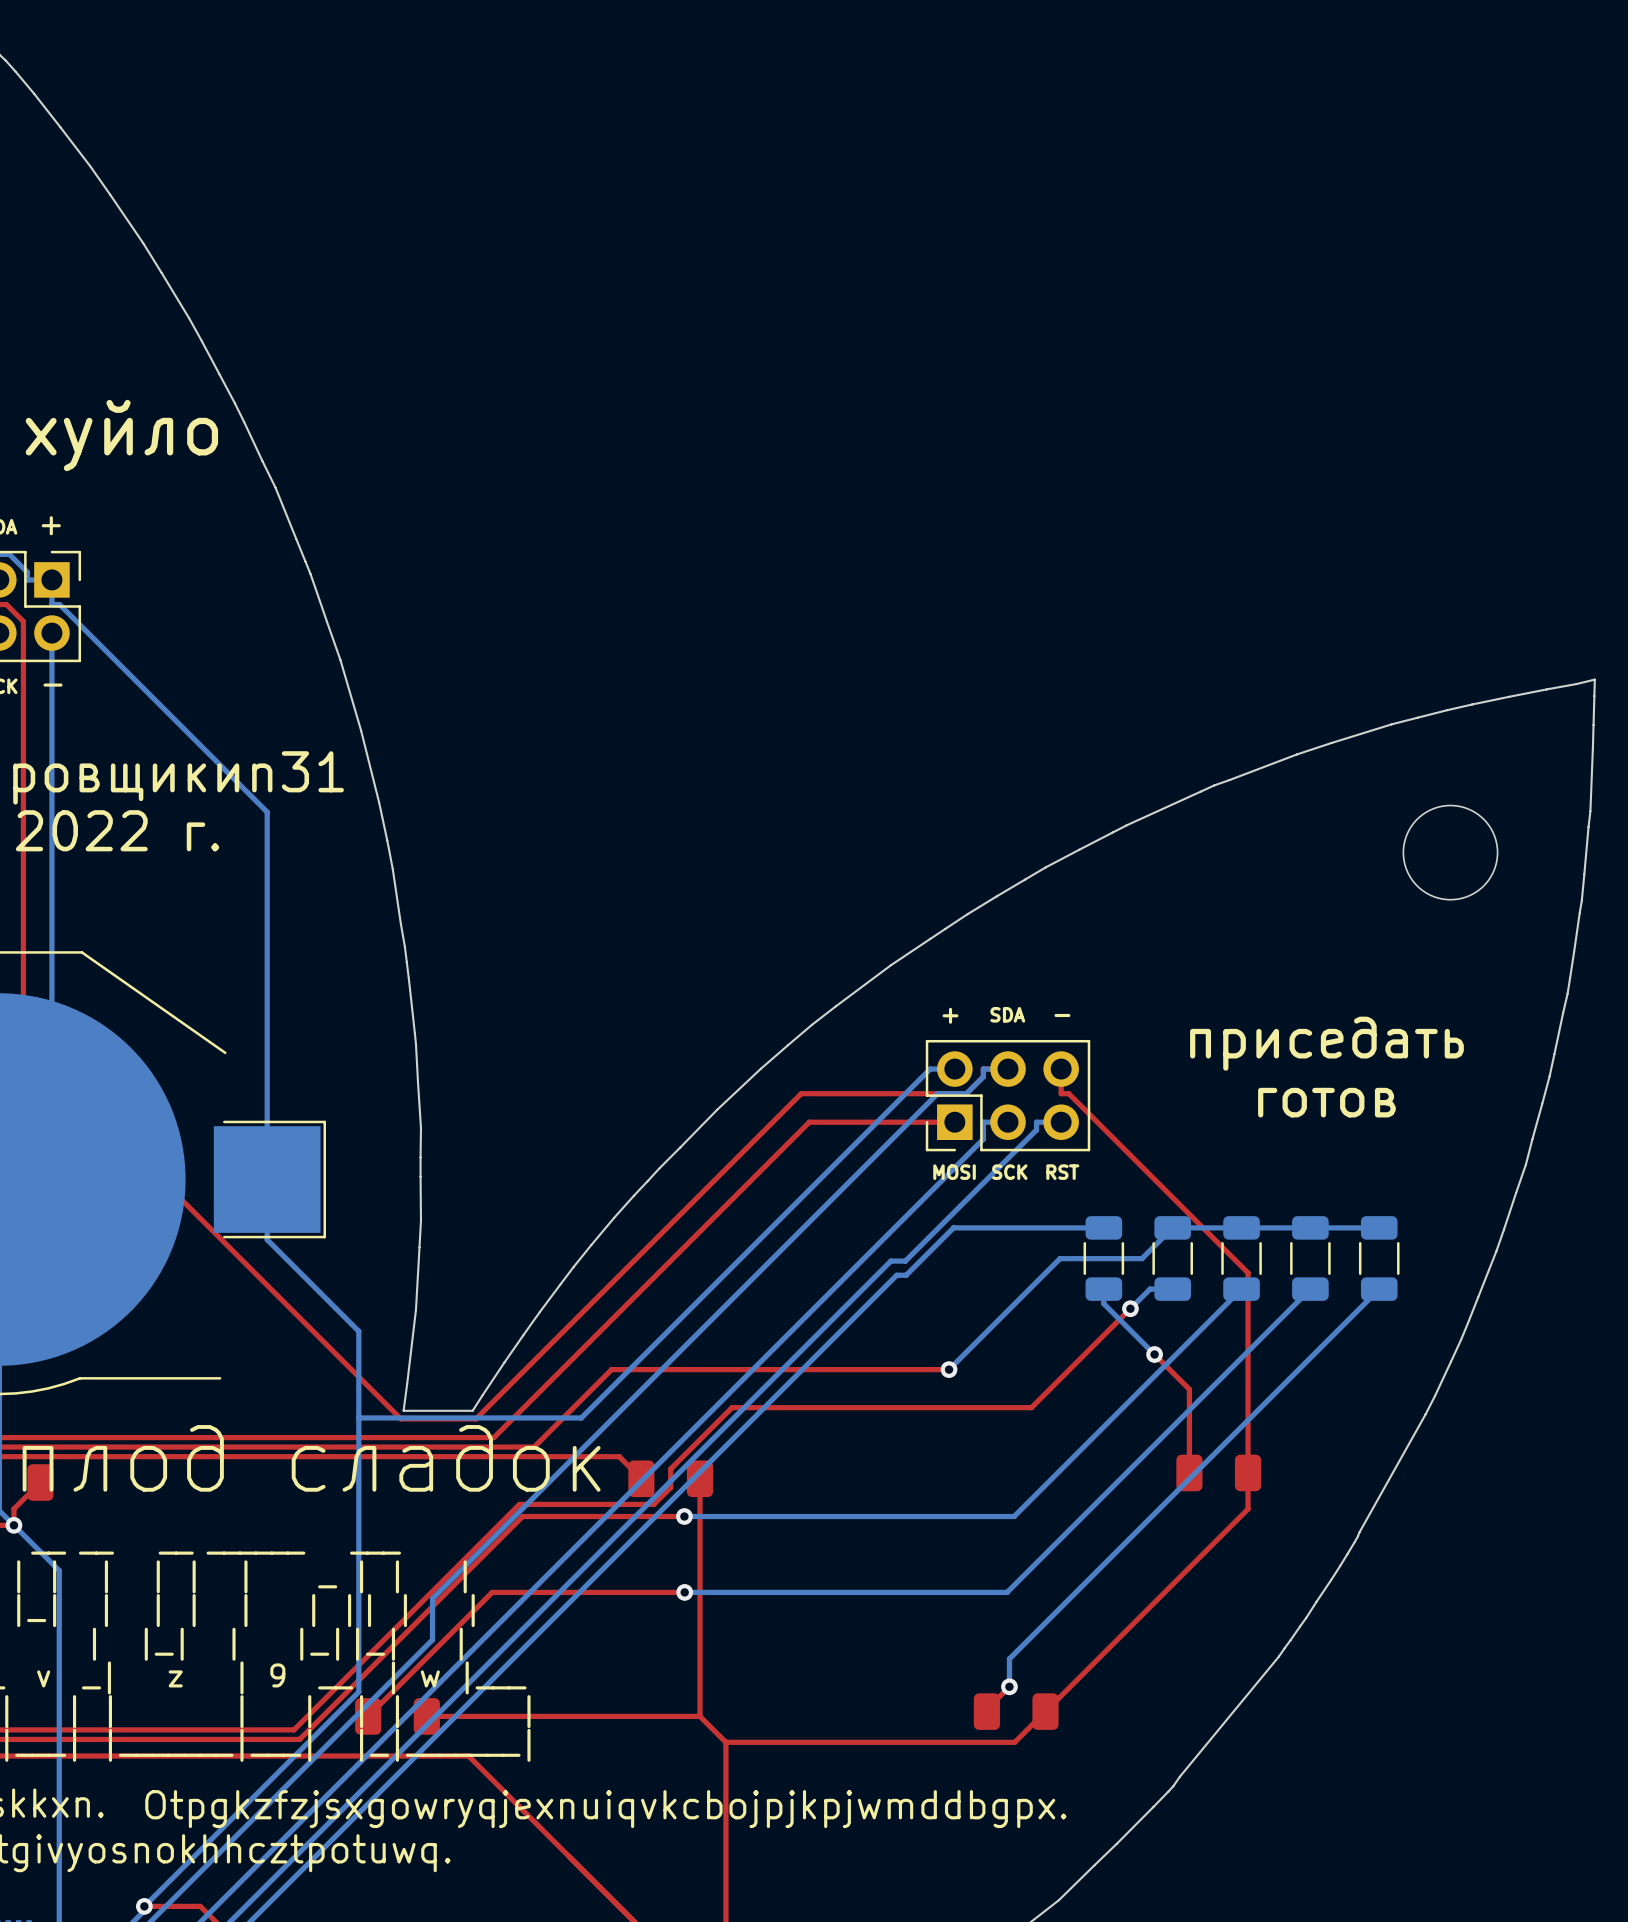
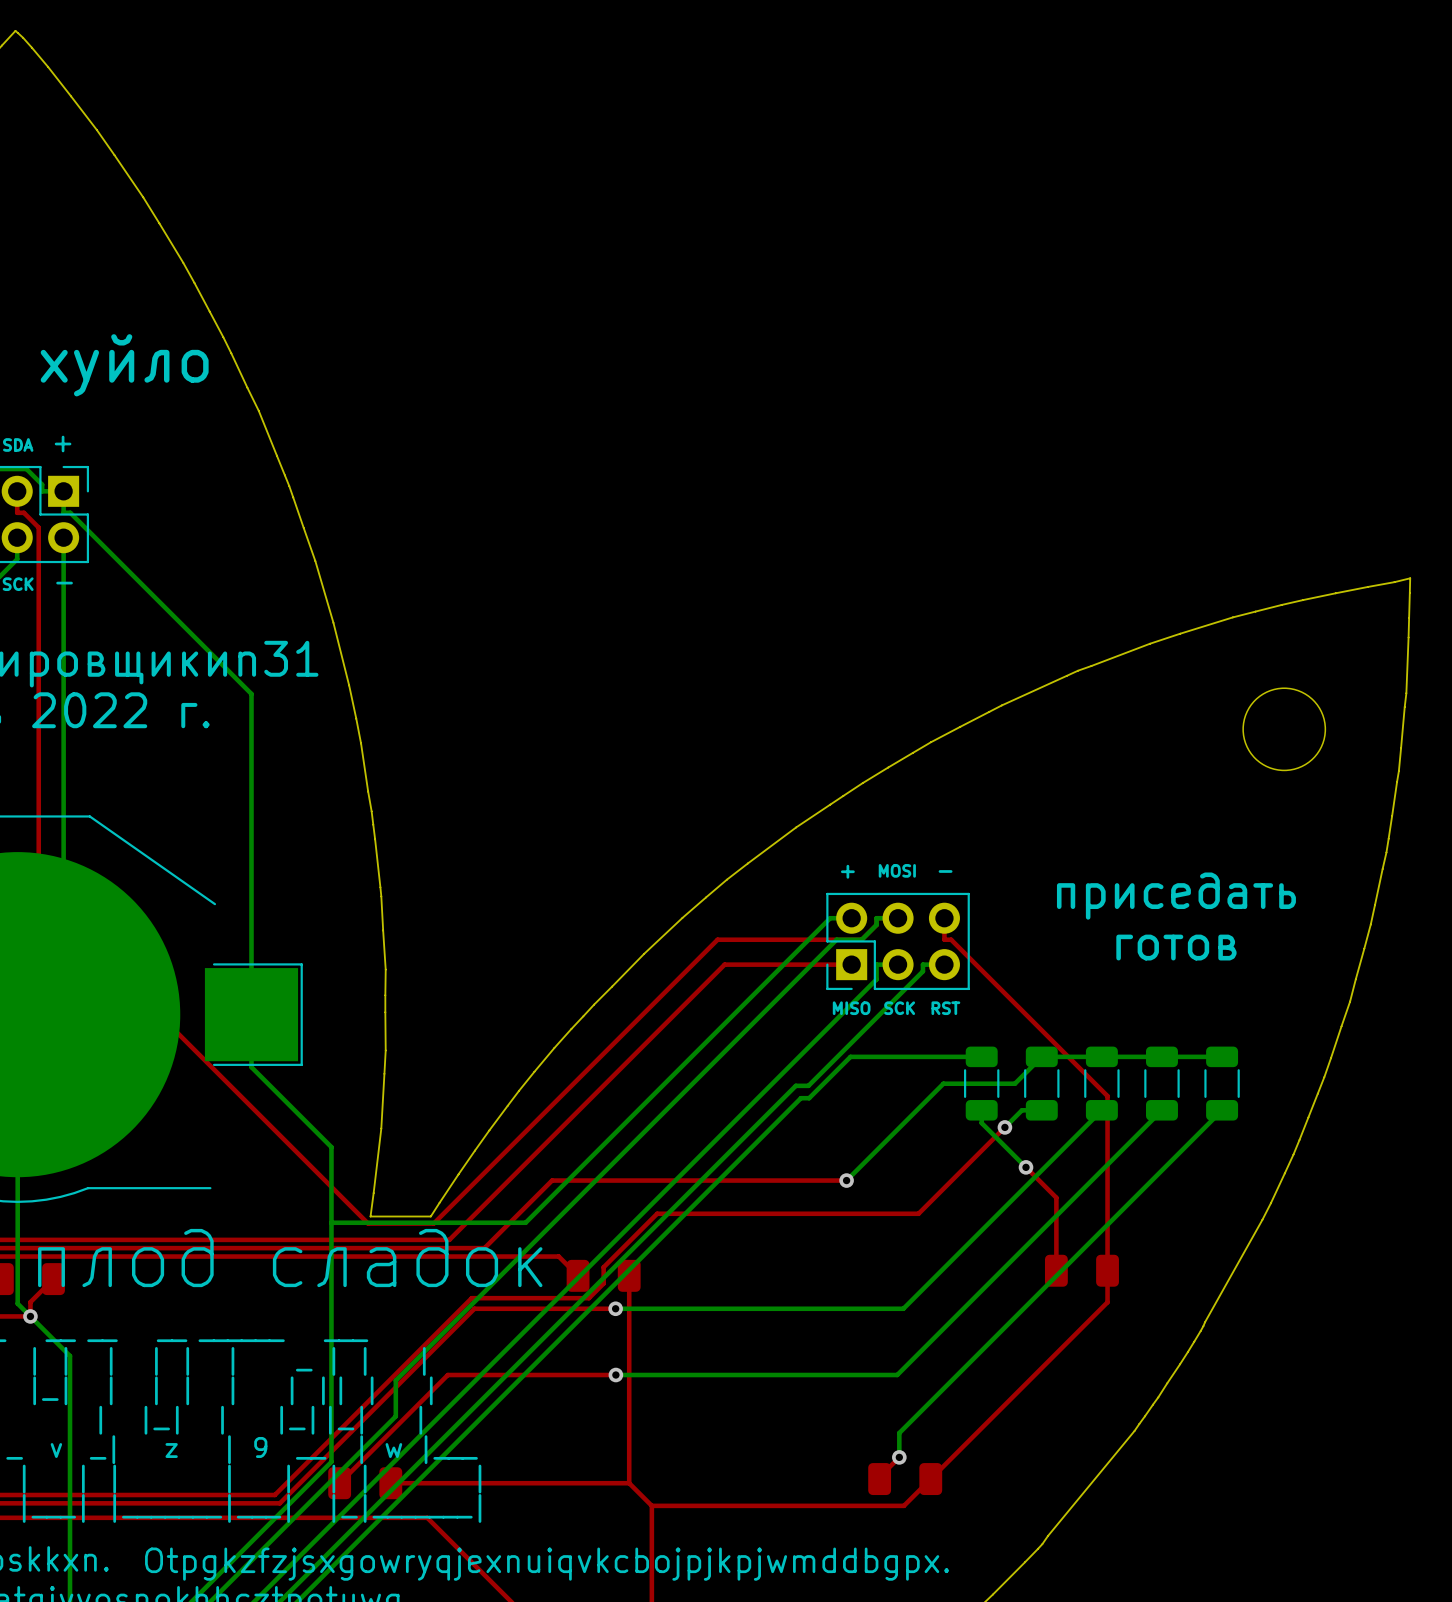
text: SDA (1007, 1014) -> MOSI (897, 870)
text: MOSI (954, 1172) -> MISO (851, 1008)

